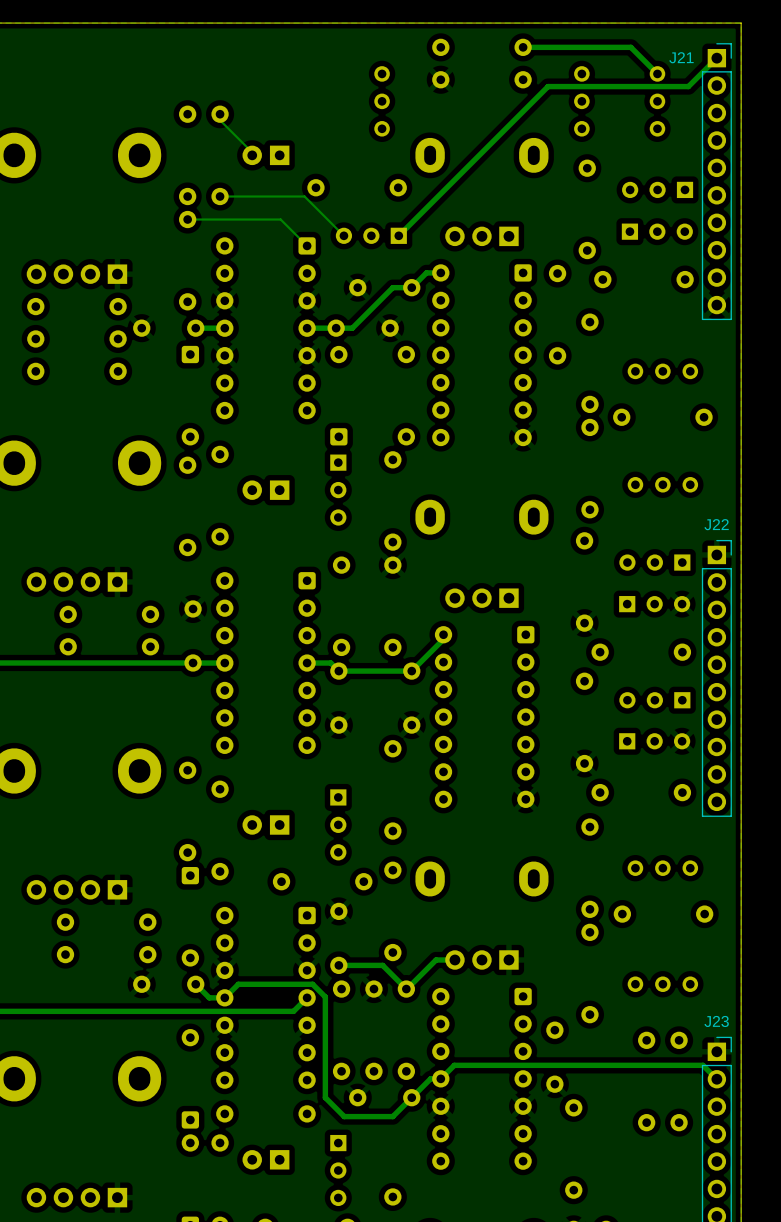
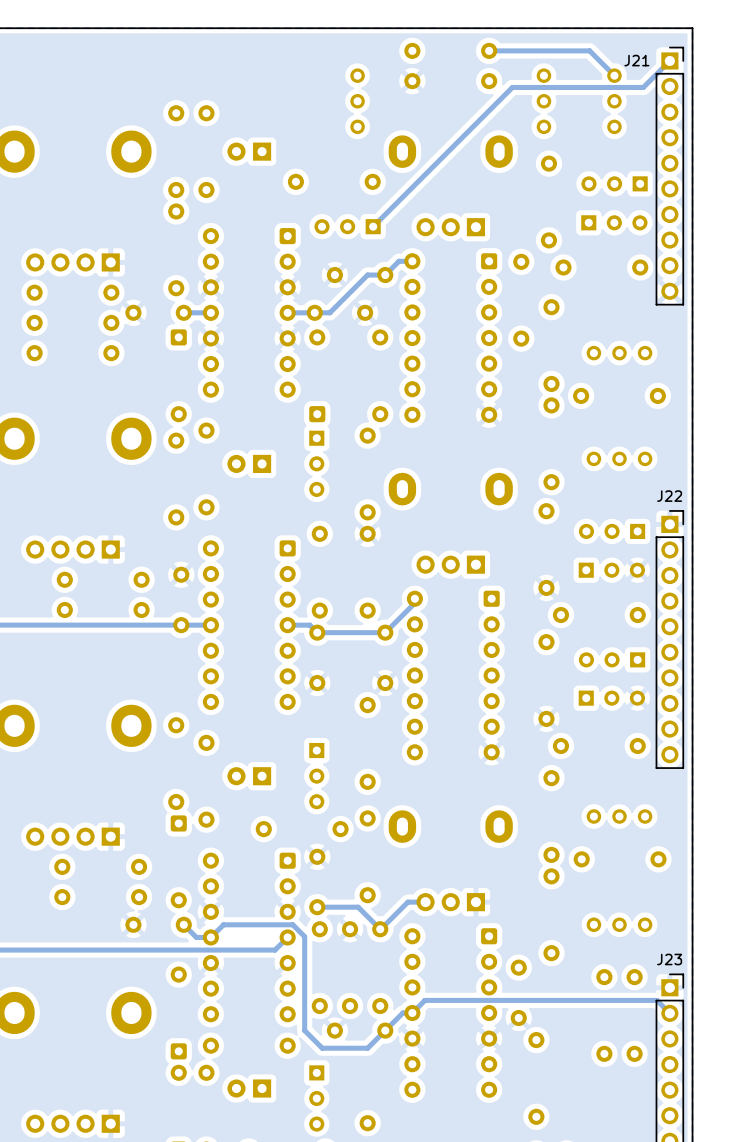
track: (220, 114) (220, 120) (252, 152) (252, 155) -> none
track: (220, 196) (304, 196) (343, 235) -> none
track: (187, 219) (280, 219) (307, 245) -> none

